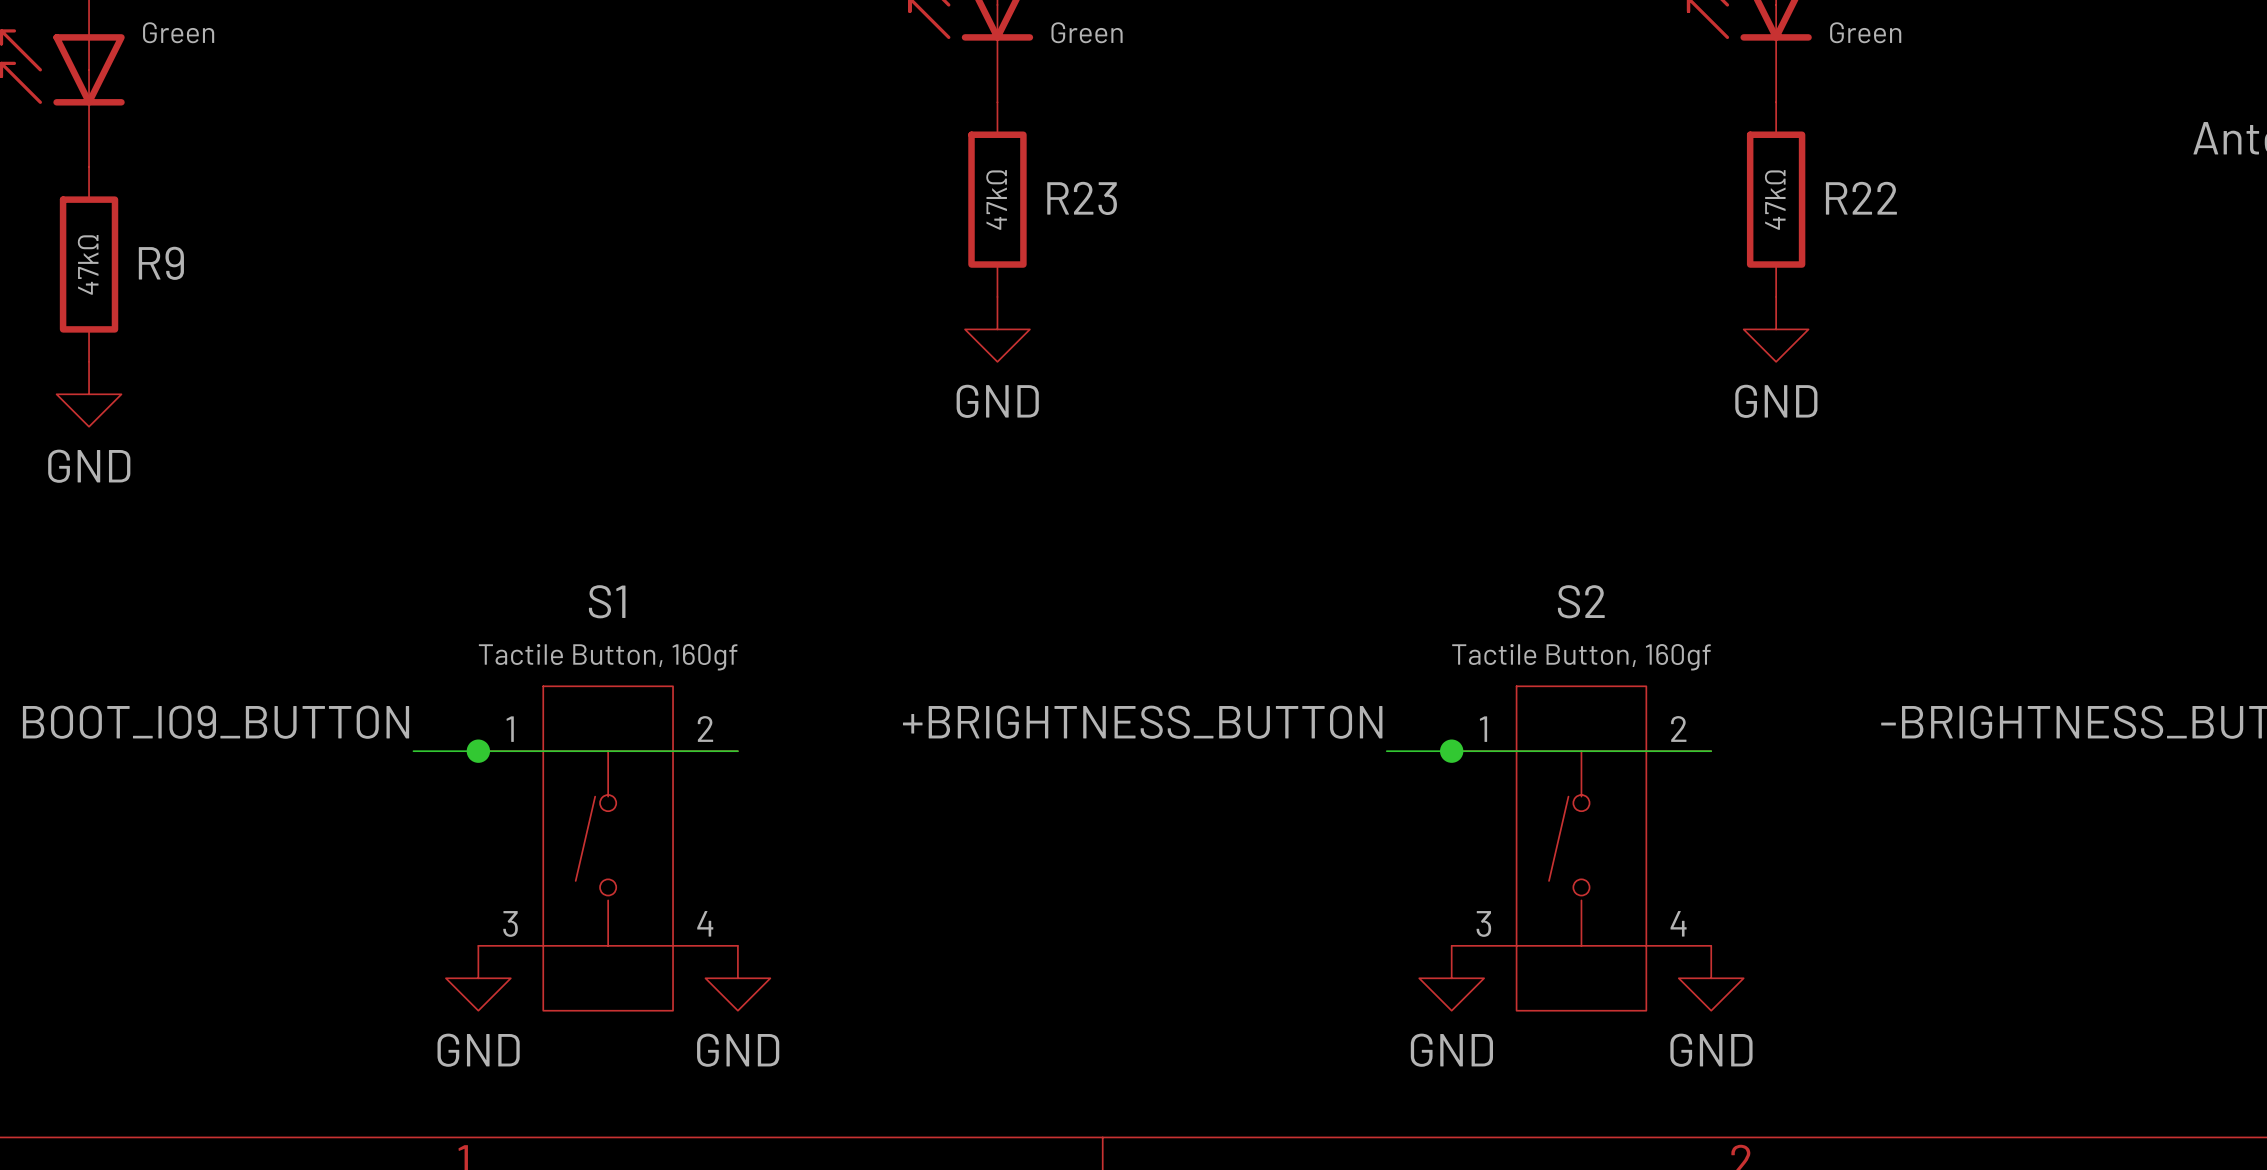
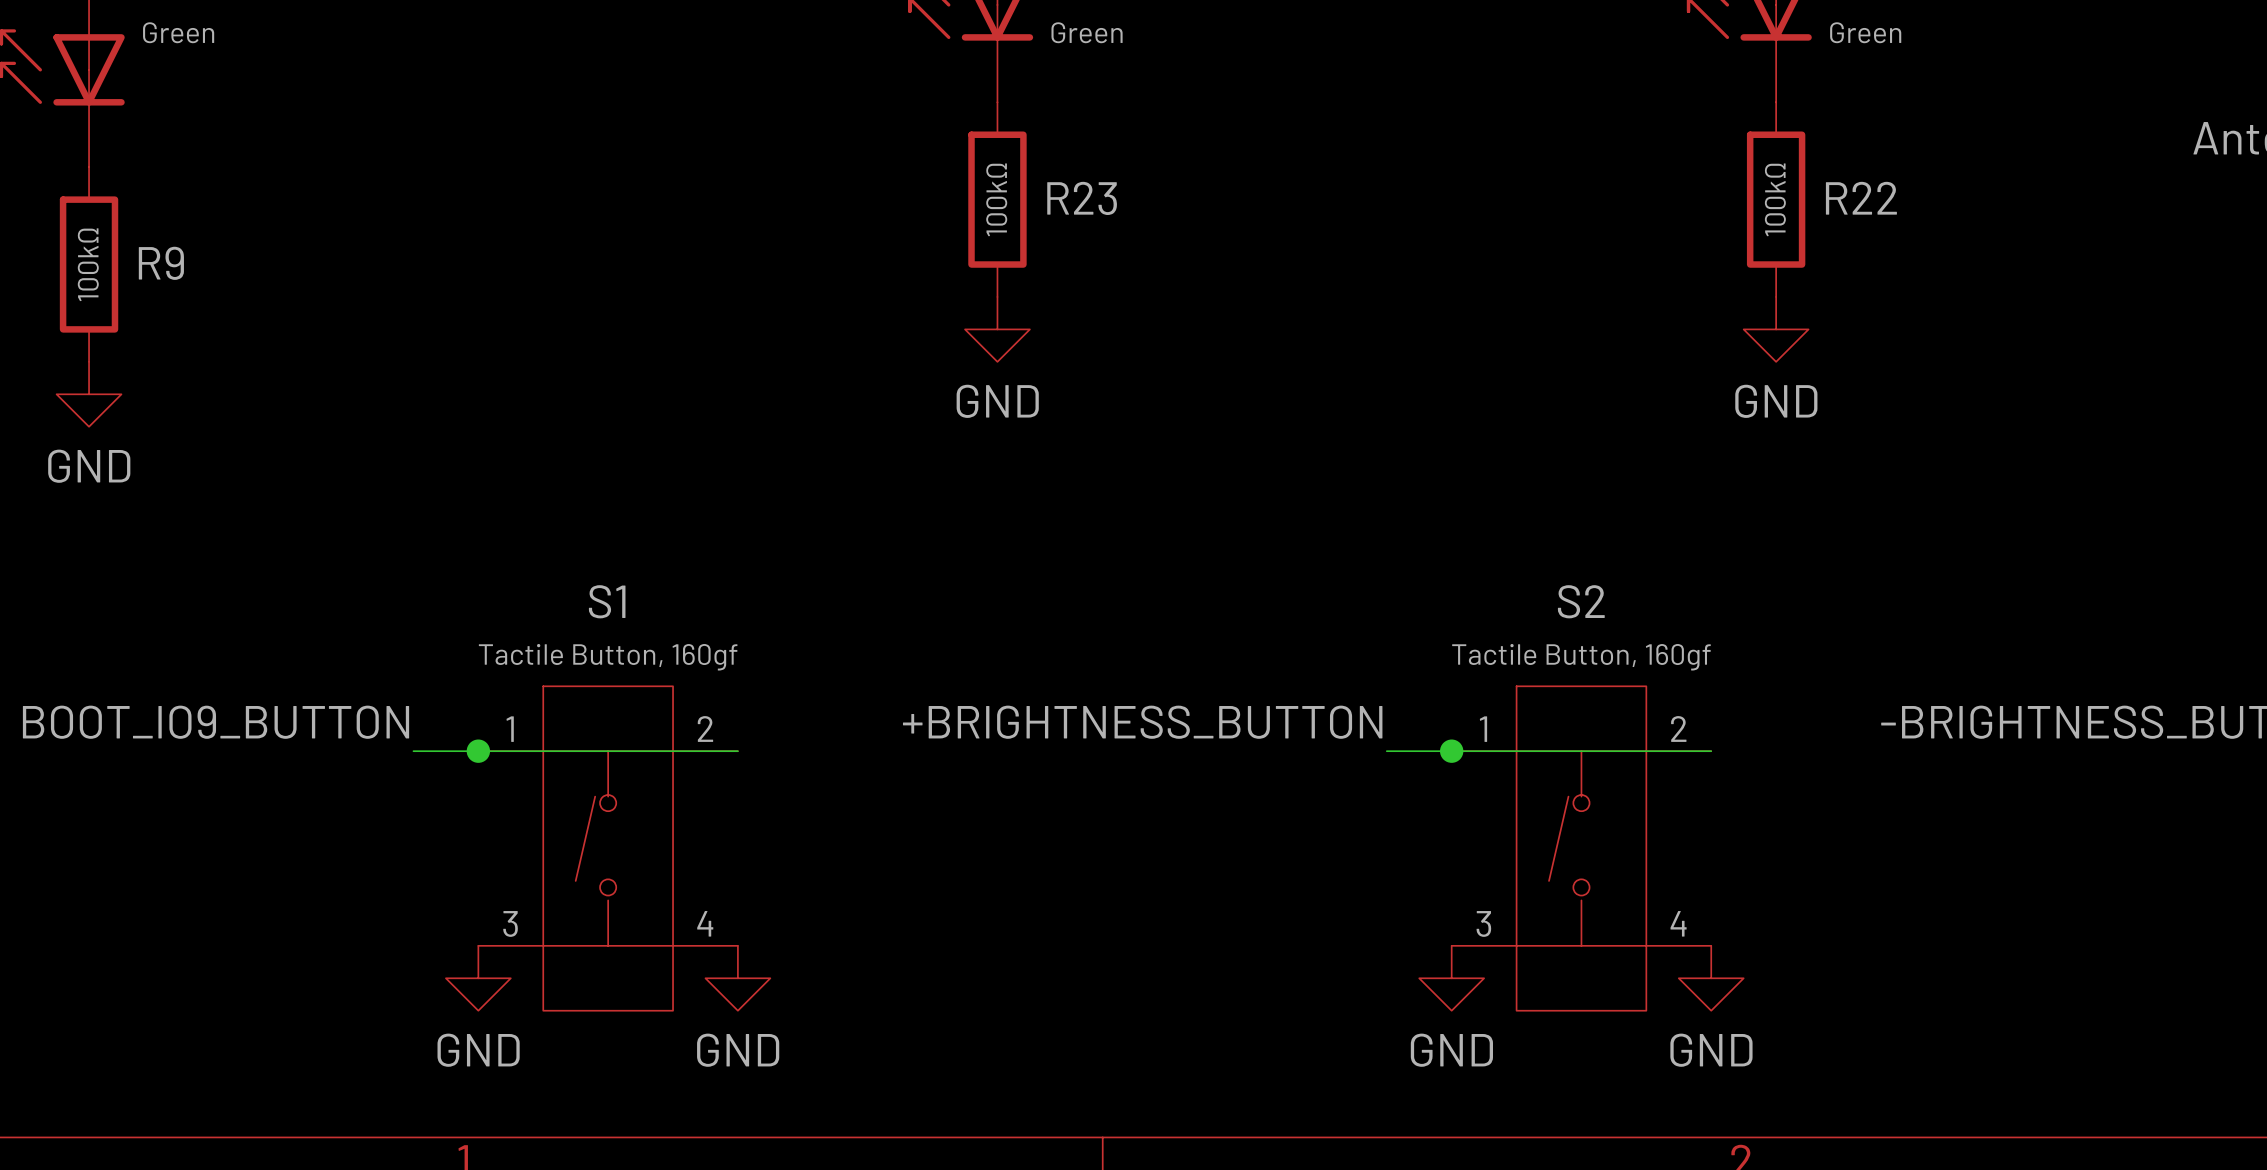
R23 value: 47kΩ (996, 199) -> 100kΩ (996, 199)
R22 value: 47kΩ (1775, 199) -> 100kΩ (1775, 199)
R9 value: 47kΩ (88, 264) -> 100kΩ (88, 264)

